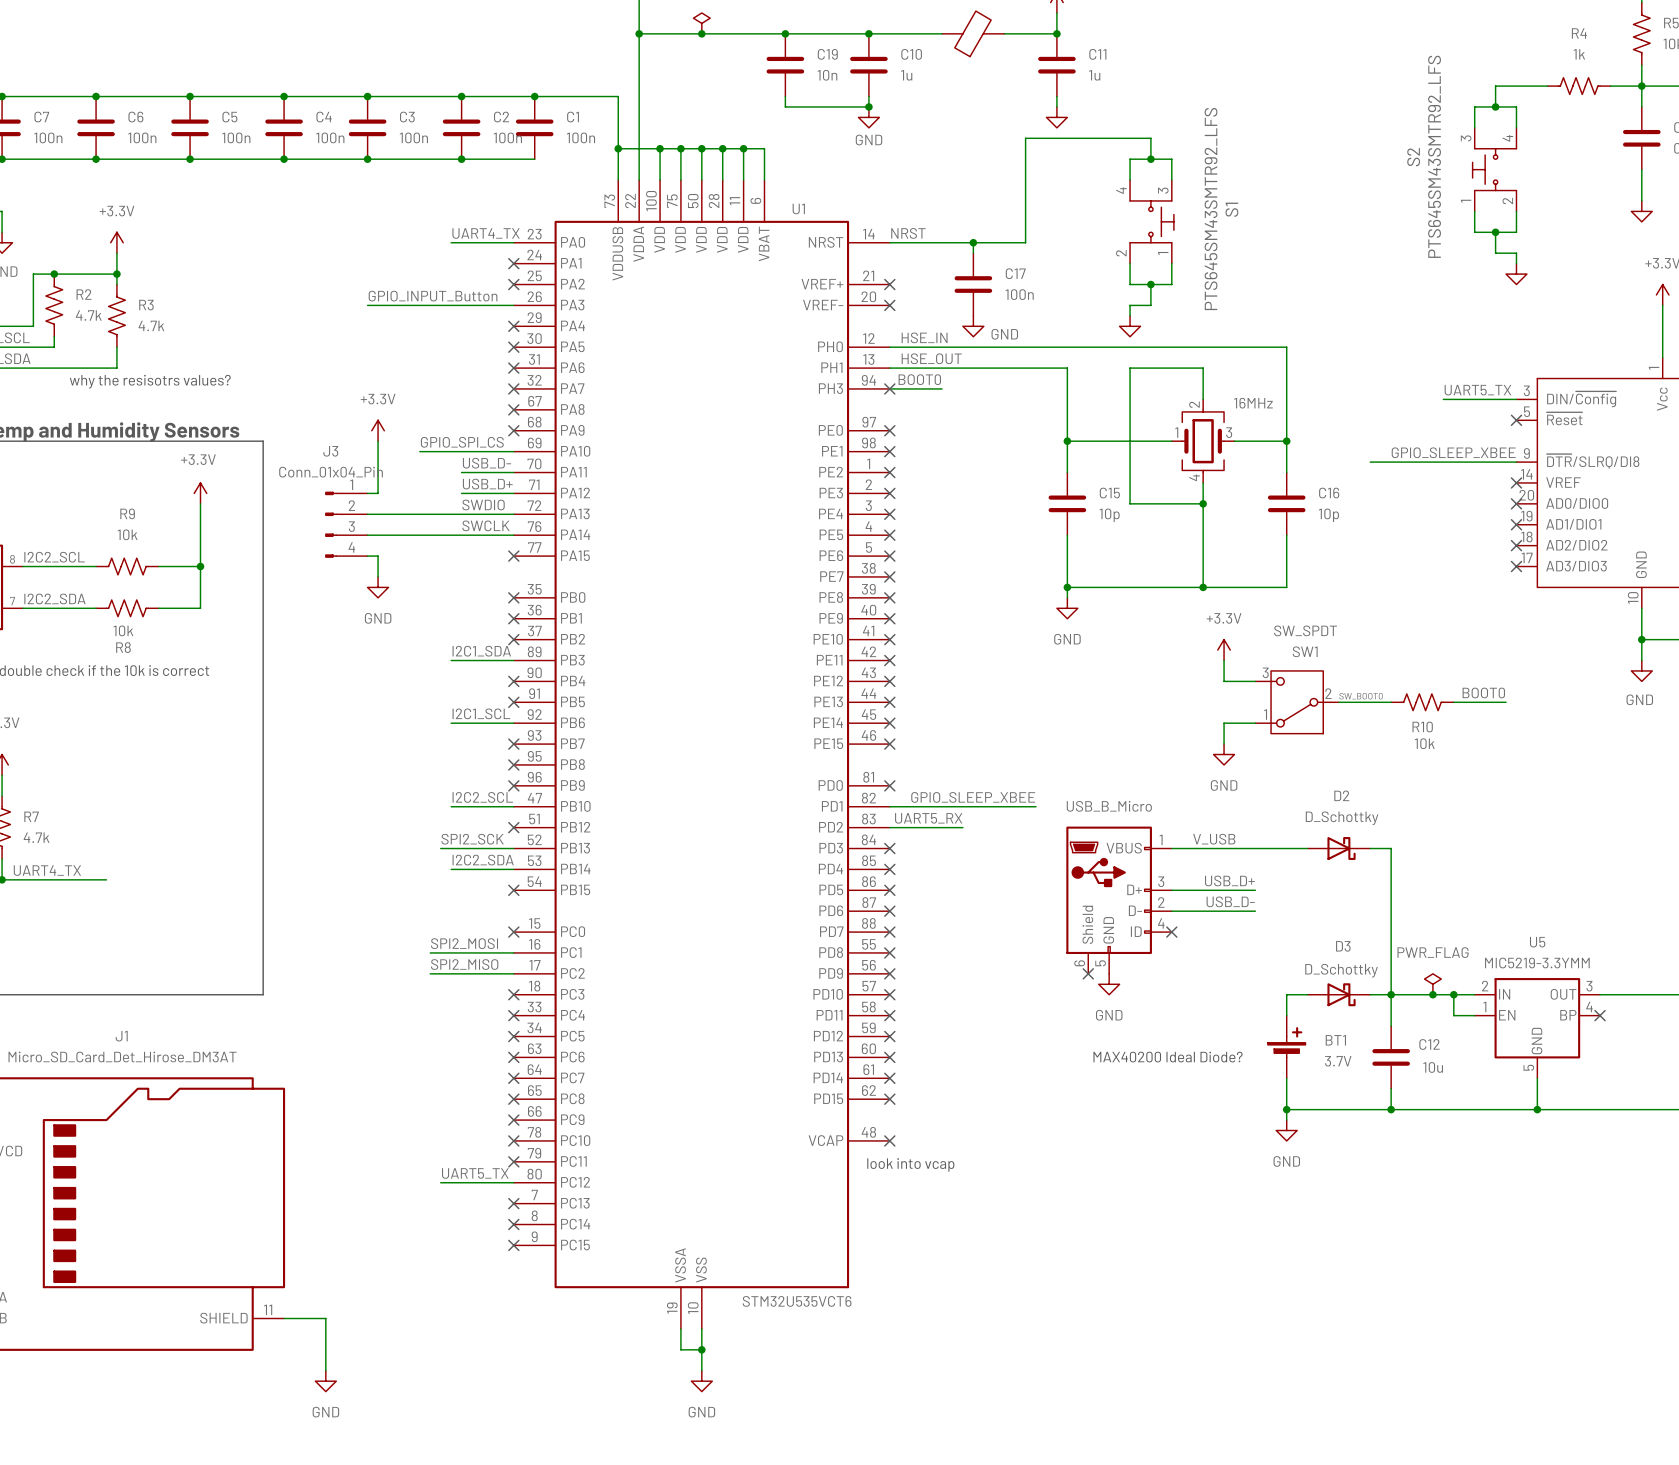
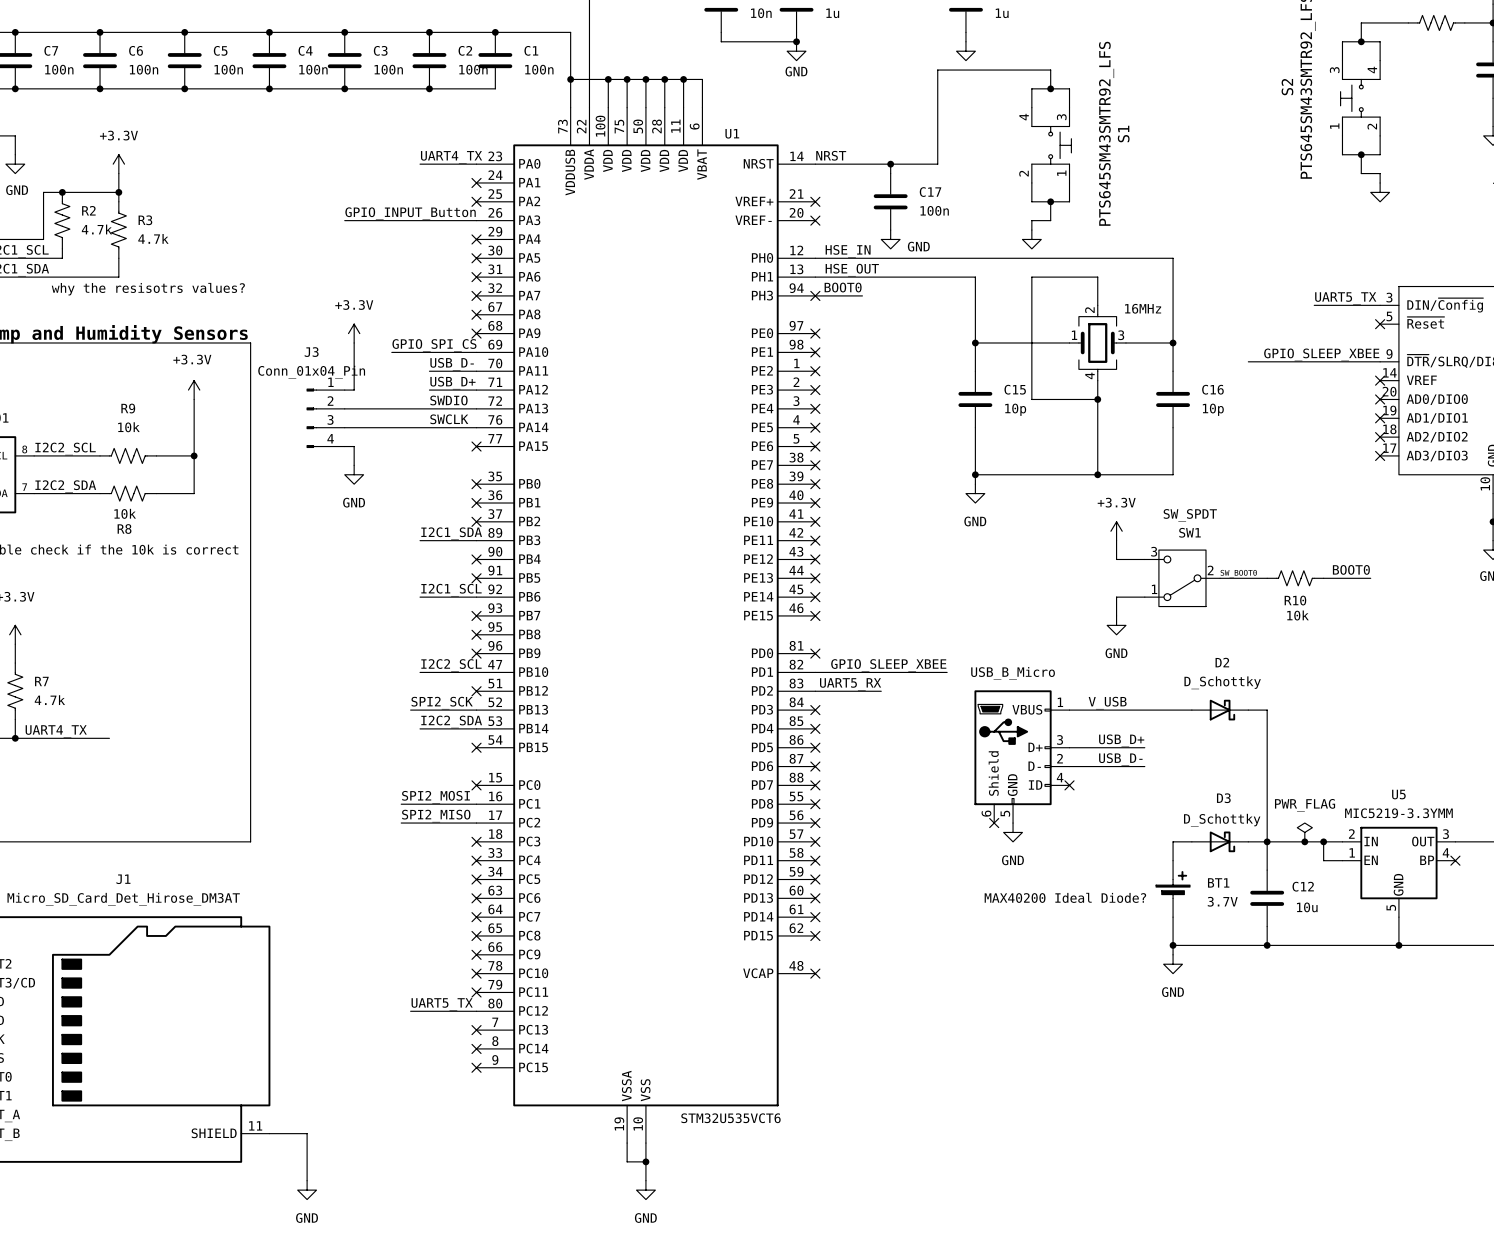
text: look into vcap (910, 1164) -> none

